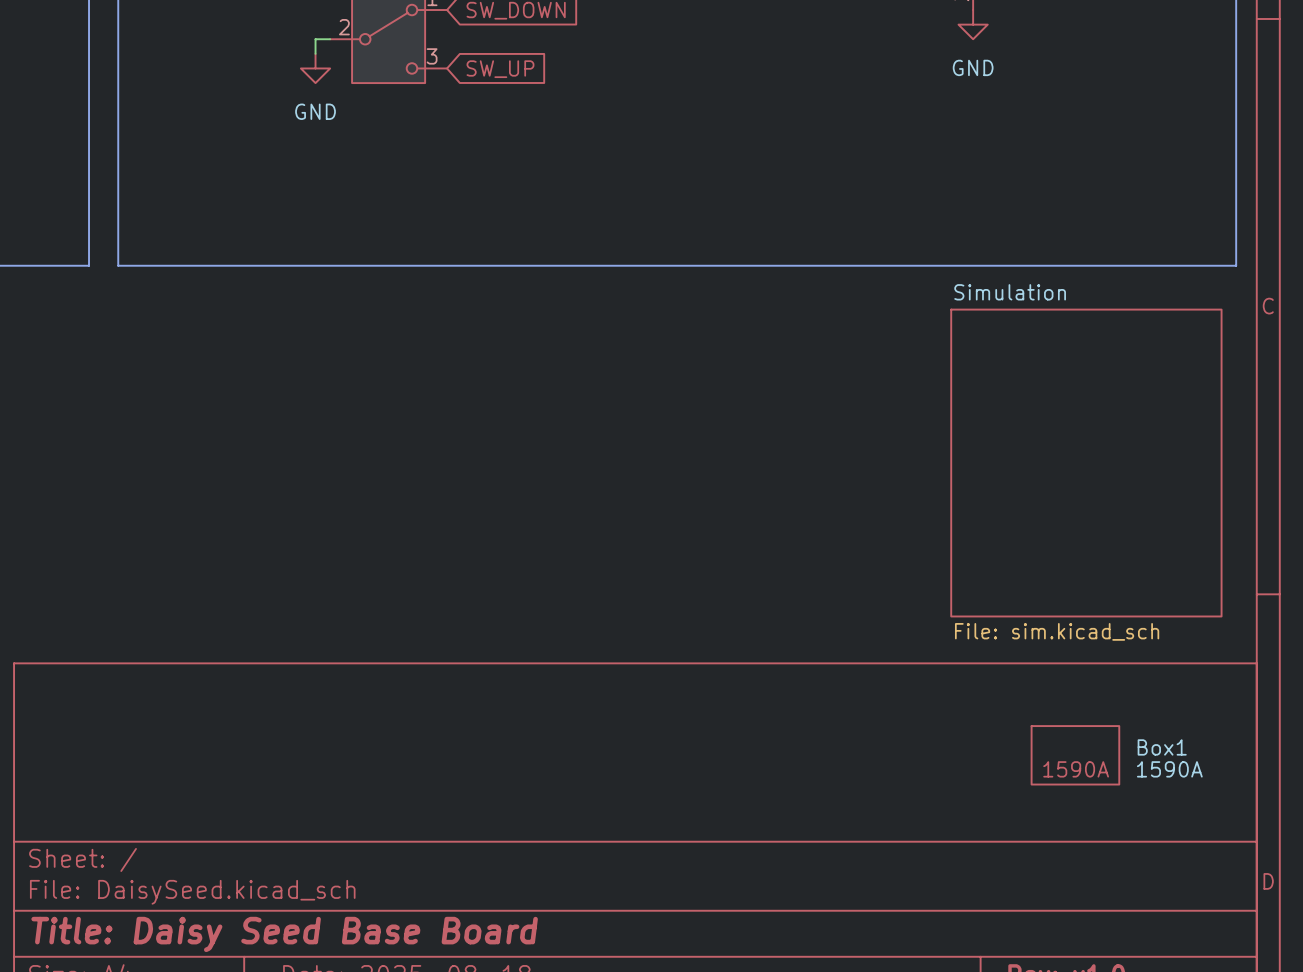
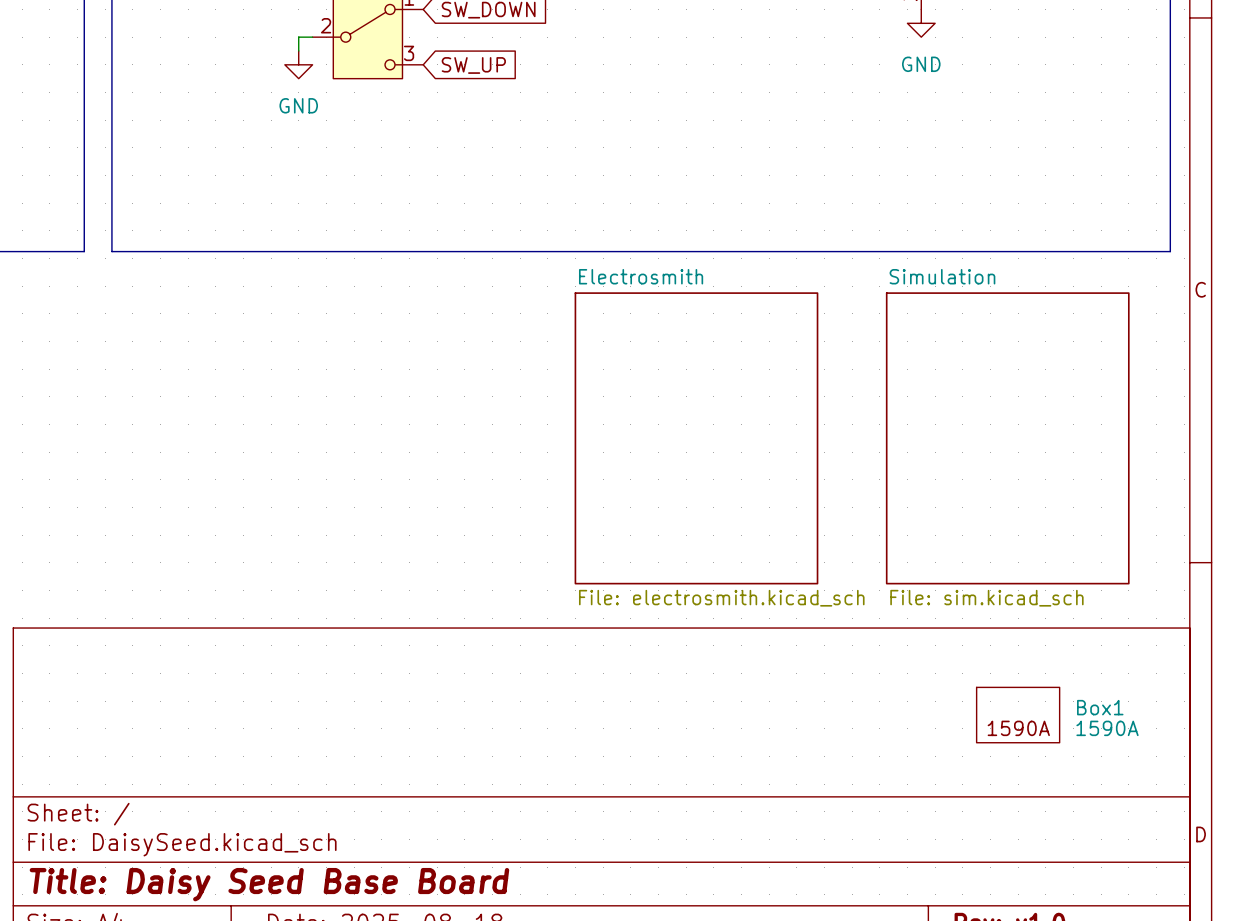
sheet Electrosmith: none -> File: electrosmith.kicad_sch (696, 438)
sheet Simulation: none -> File: sim.kicad_sch (1007, 438)
sheet Simulation: File: sim.kicad_sch (1086, 463) -> none

